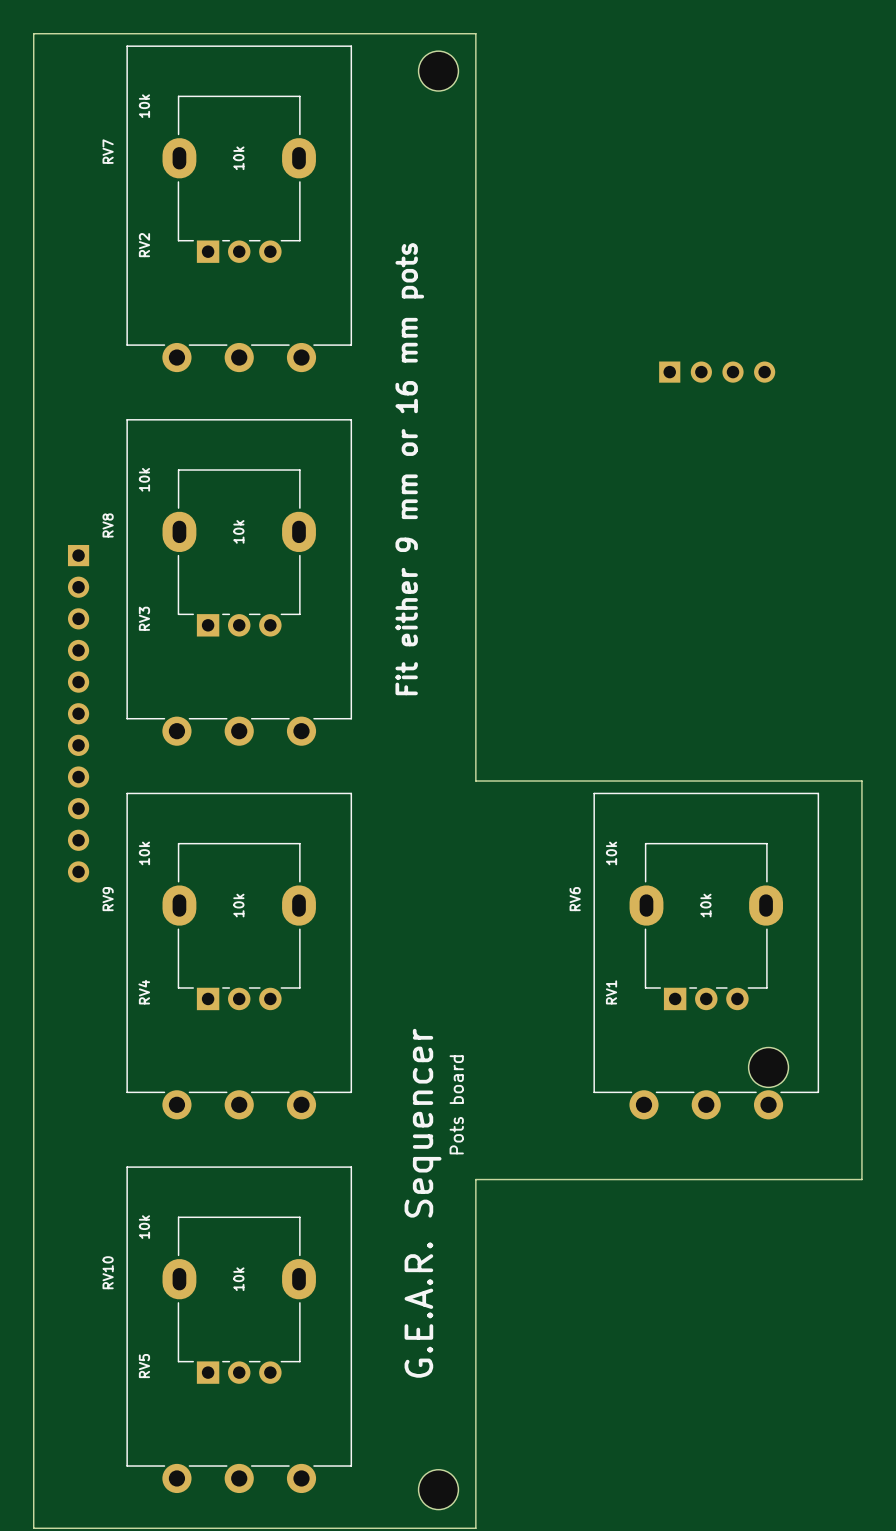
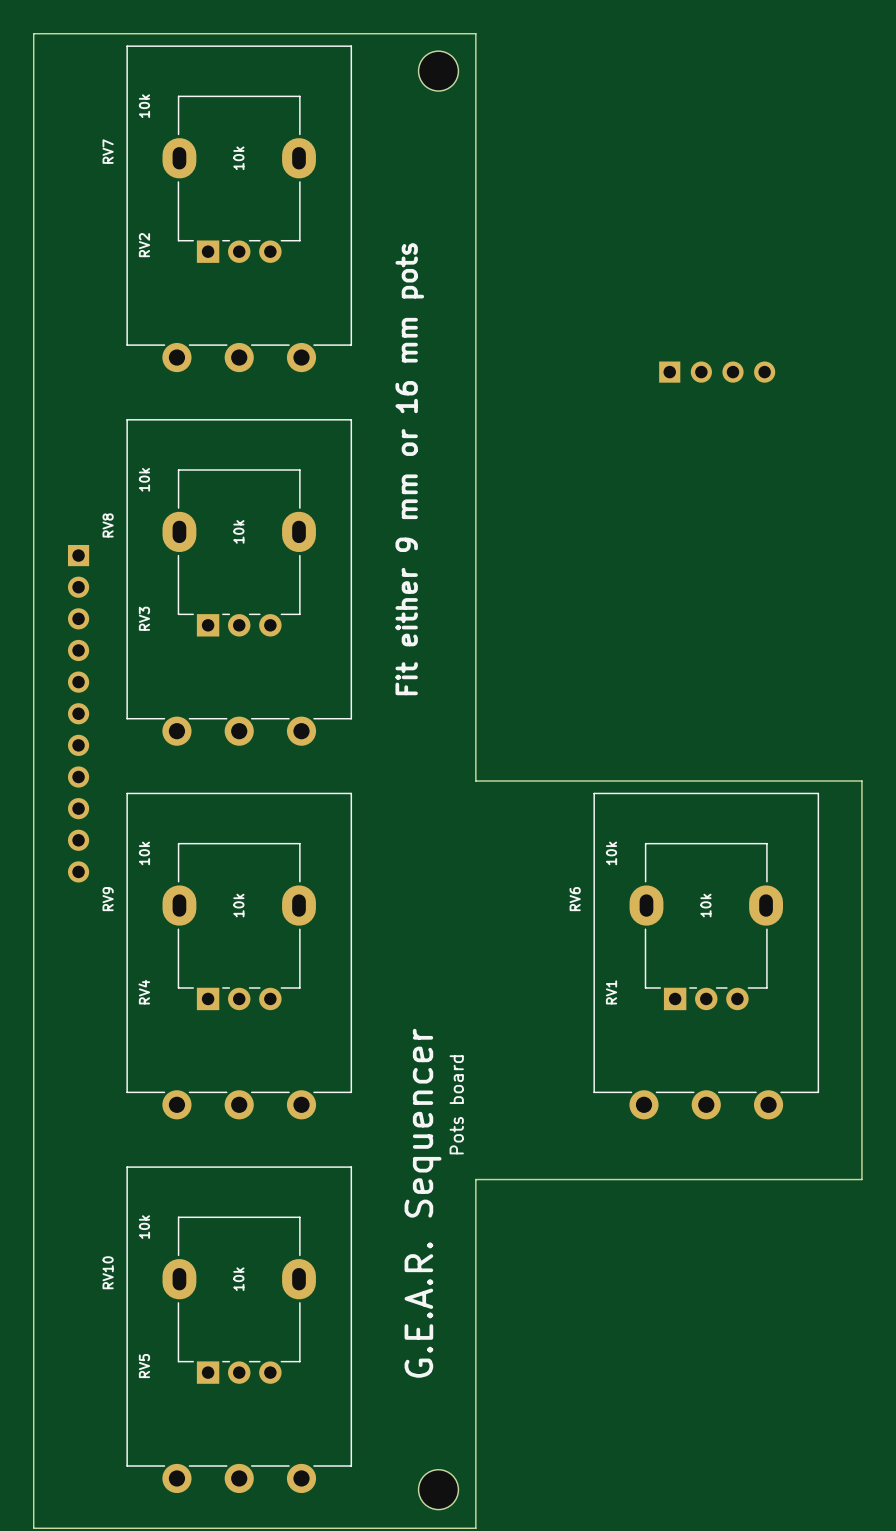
part: (768, 1067) -> none

